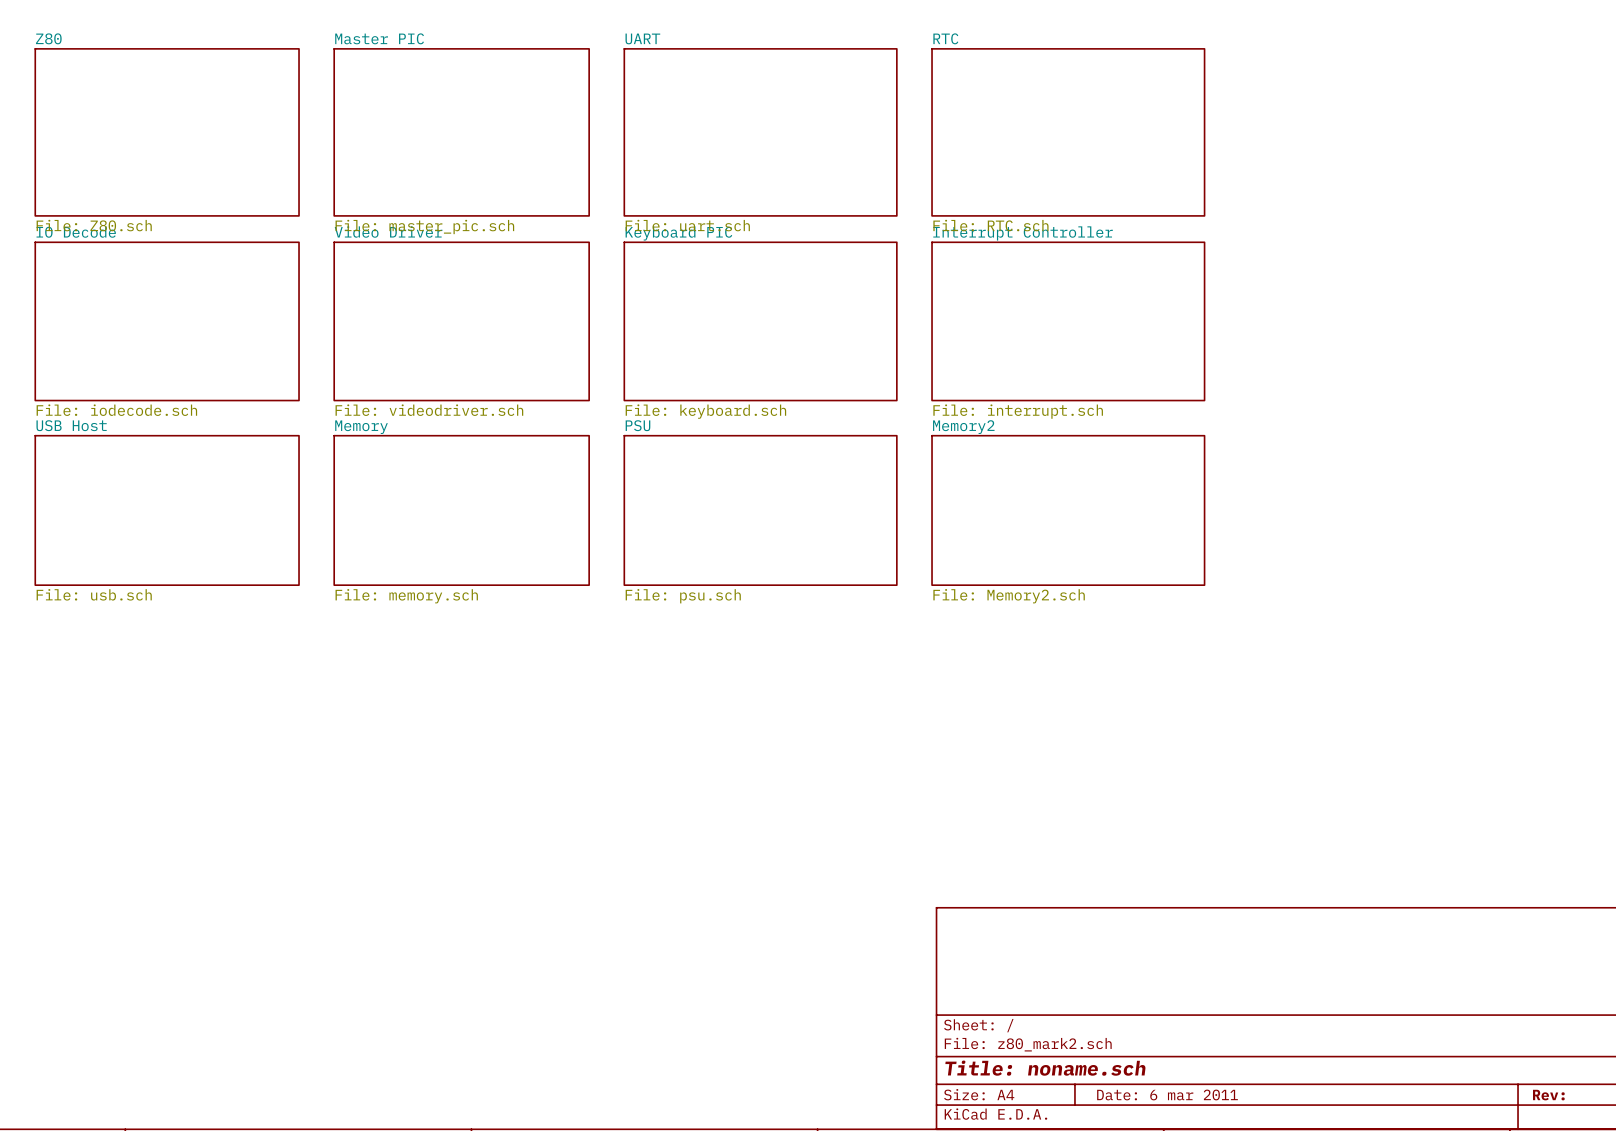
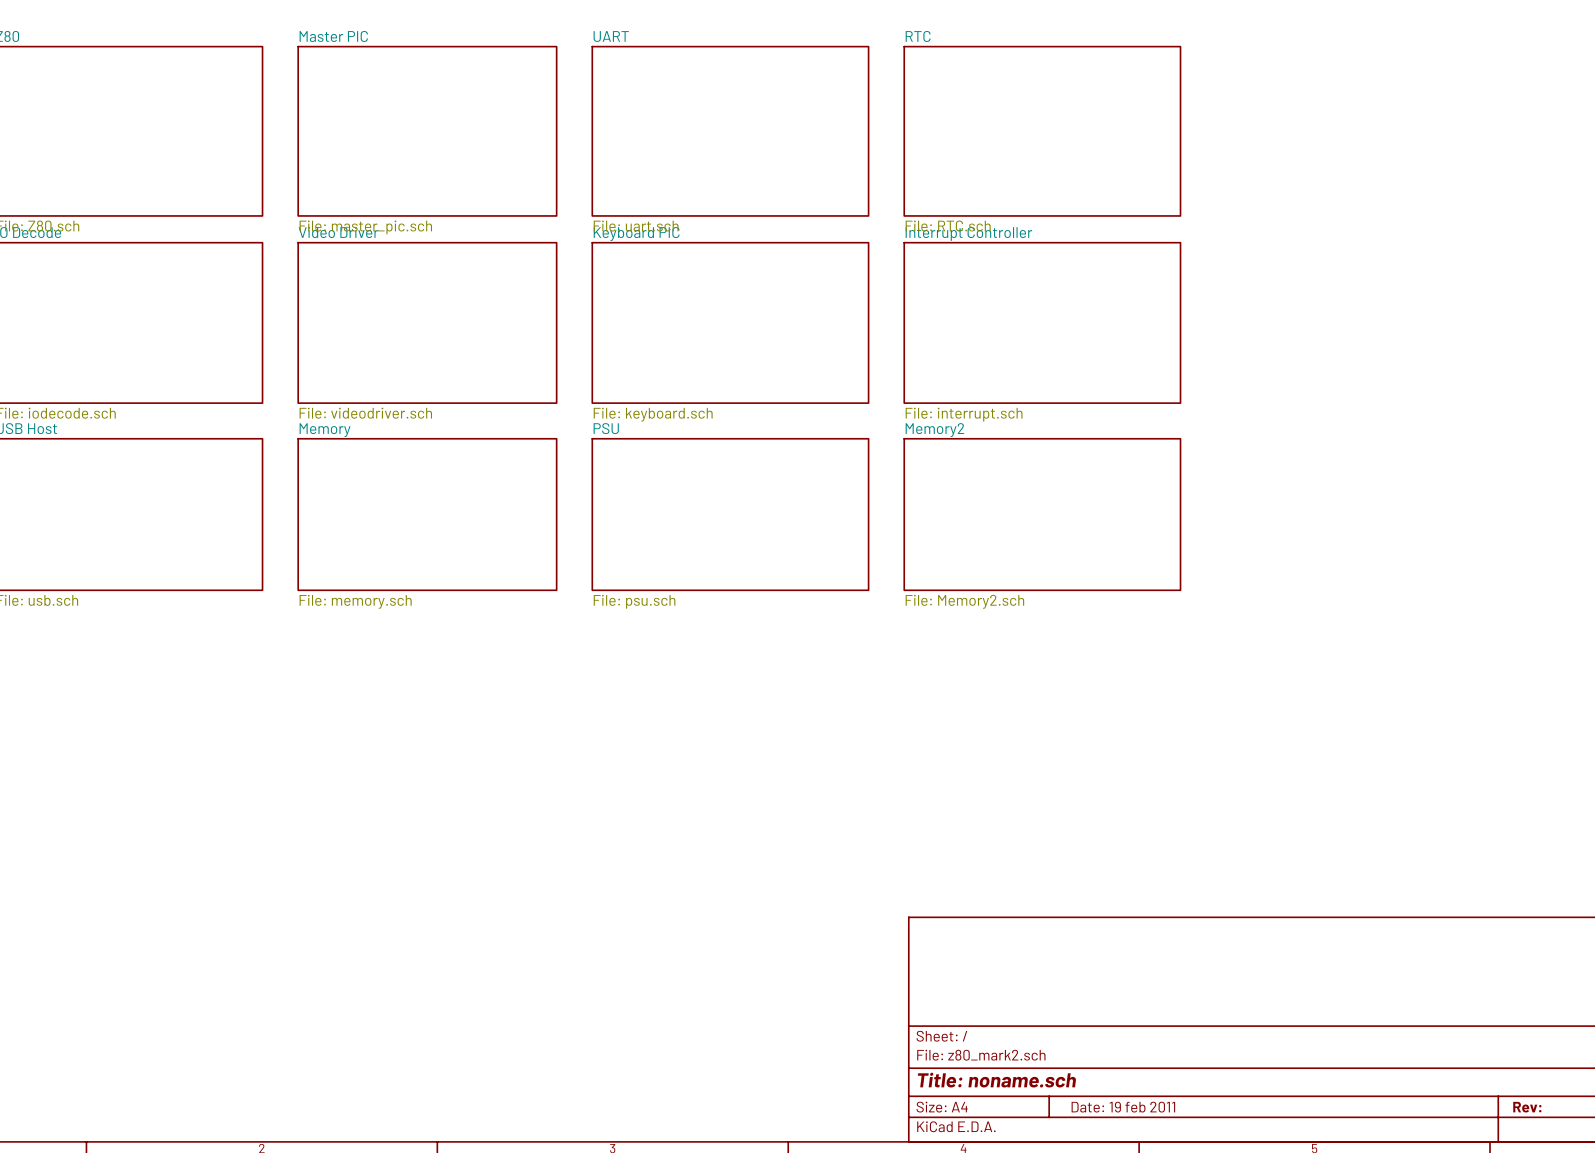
title block: Date: 6 mar 2011 (1167, 1094) -> Date: 19 feb 2011 (1123, 1107)

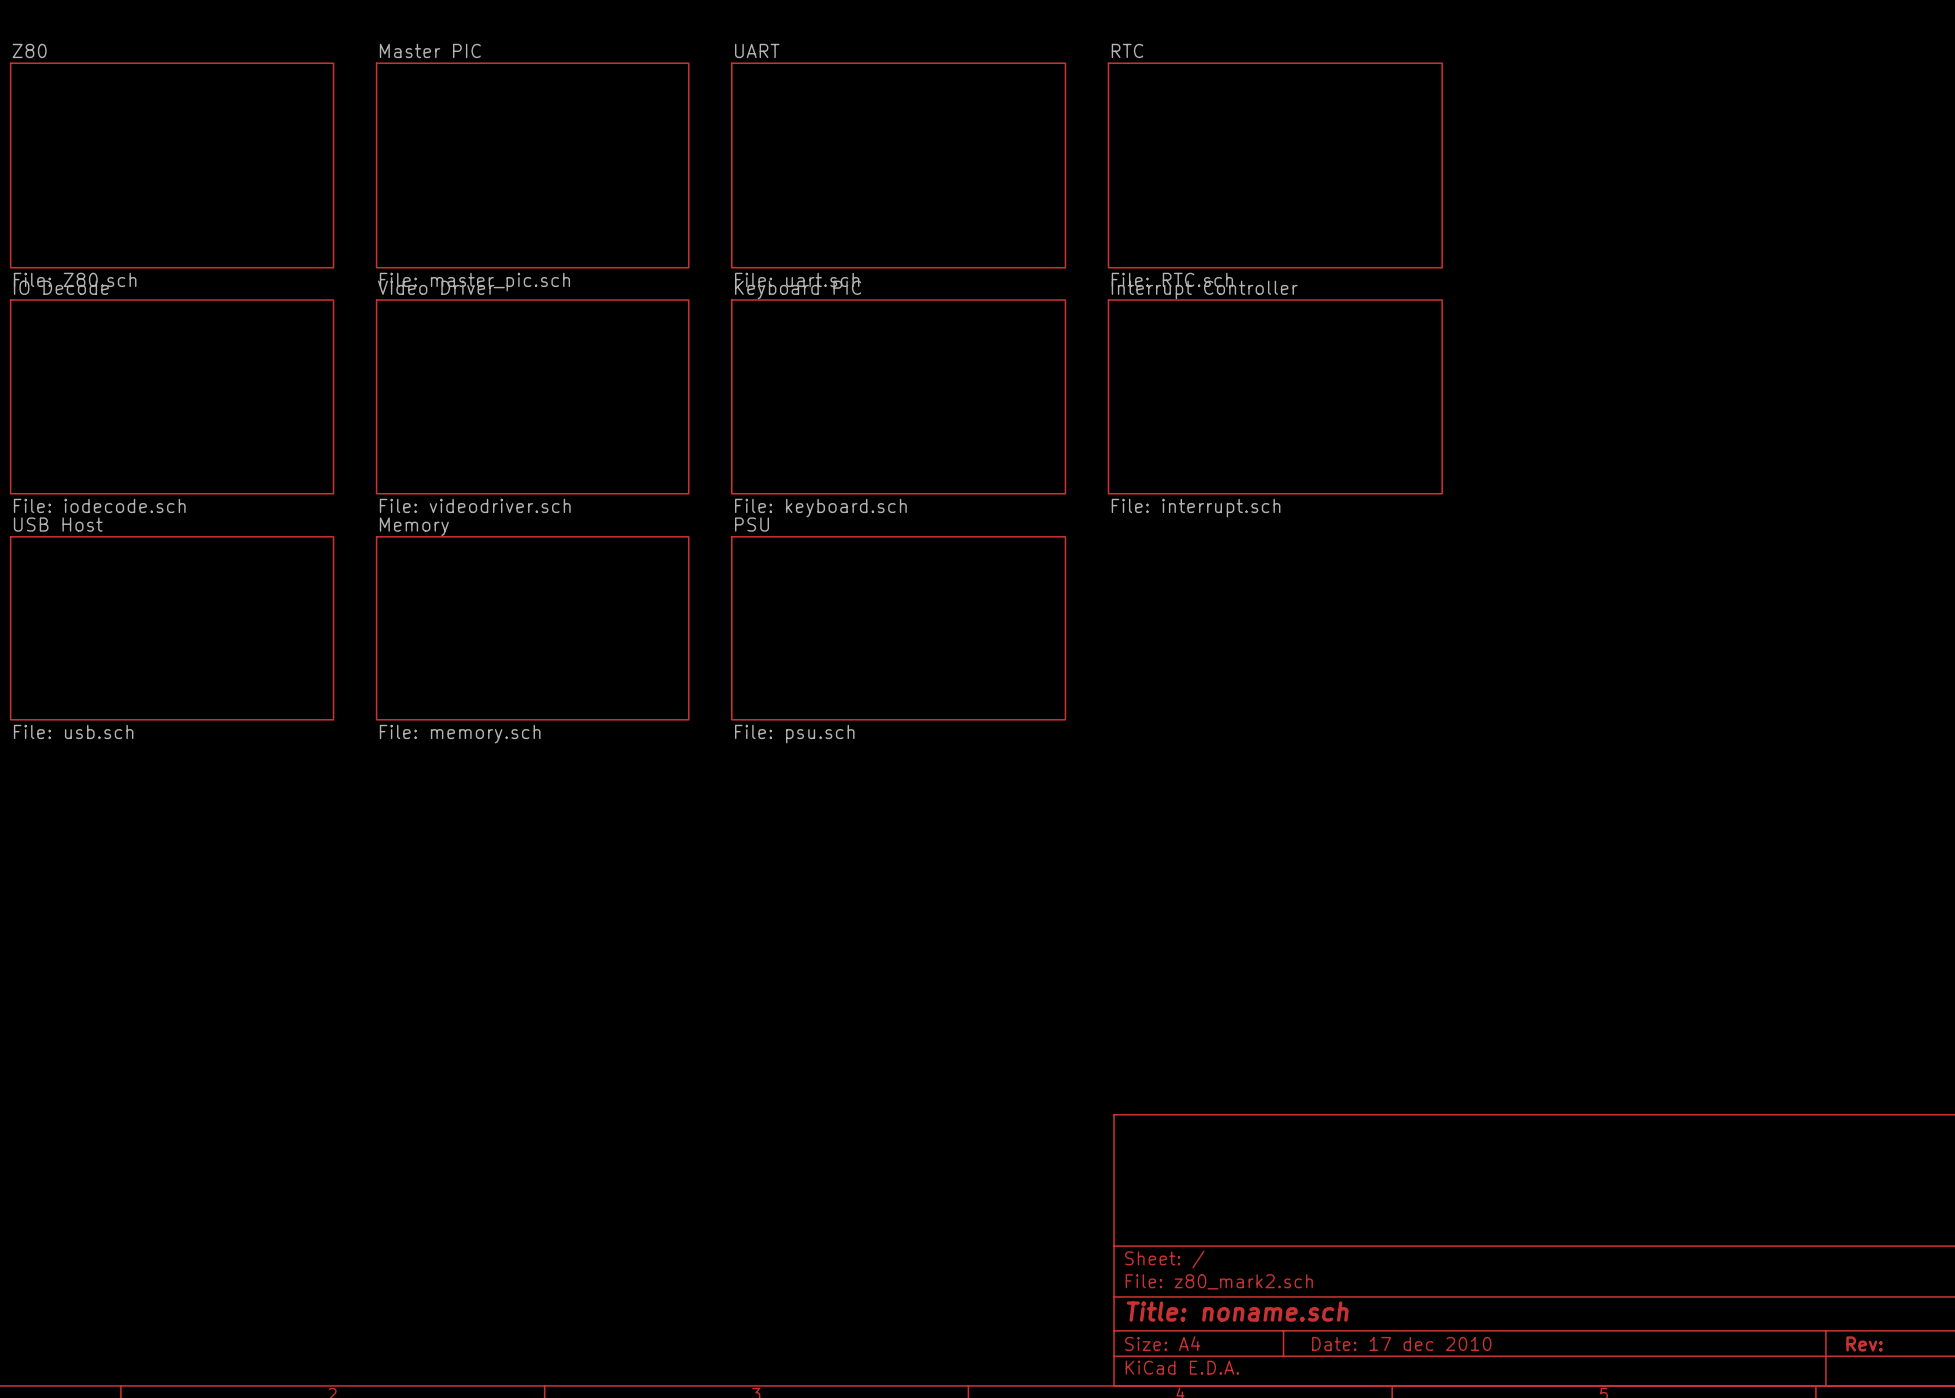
sheet Memory2: File: Memory2.sch (1042, 514) -> none
title block: Date: 19 feb 2011 (1123, 1107) -> Date: 17 dec 2010 (1401, 1343)

